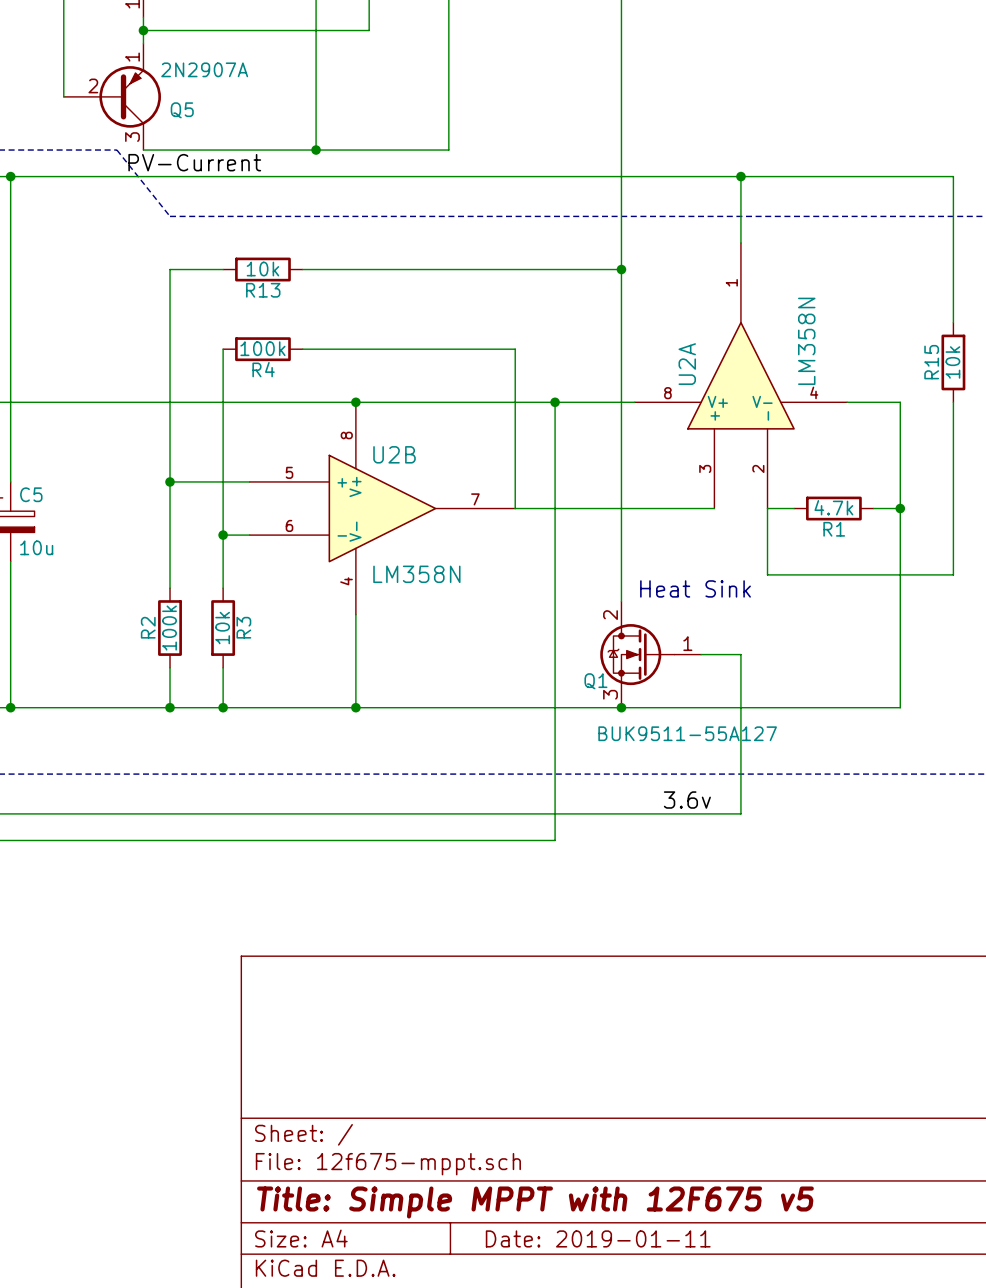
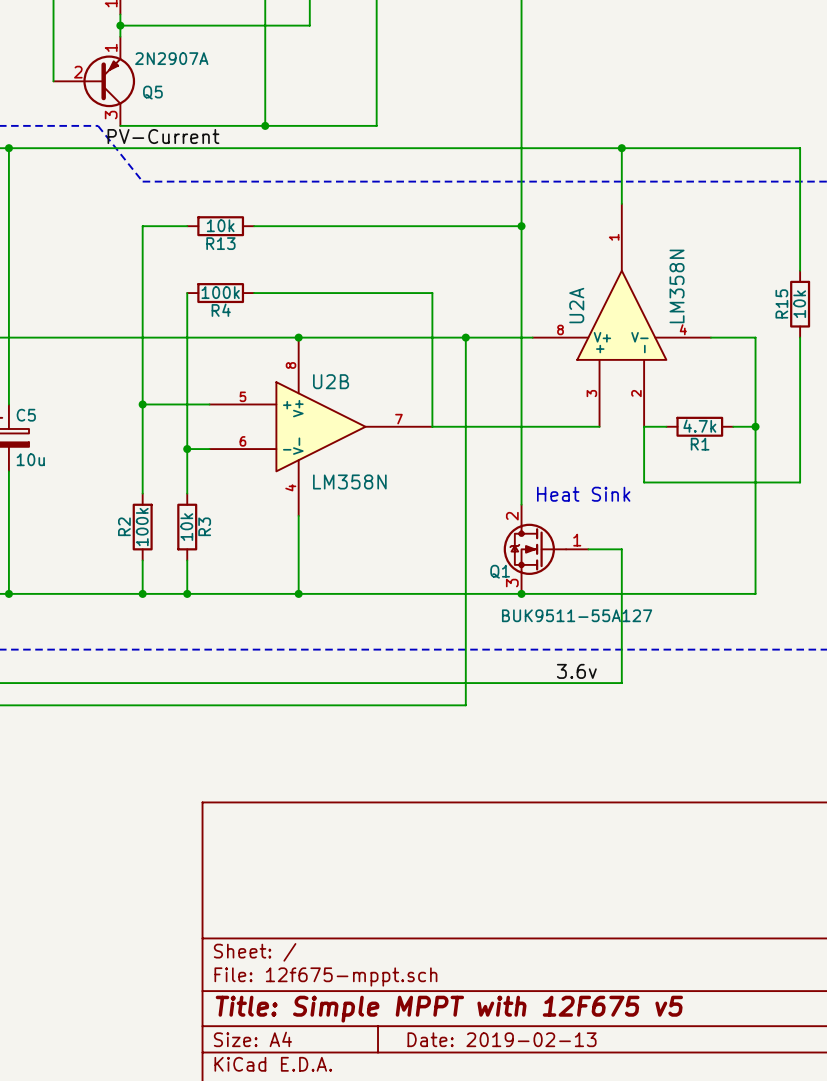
title block: Date: 2019-01-11 (598, 1238) -> Date: 2019-02-13 (502, 1039)

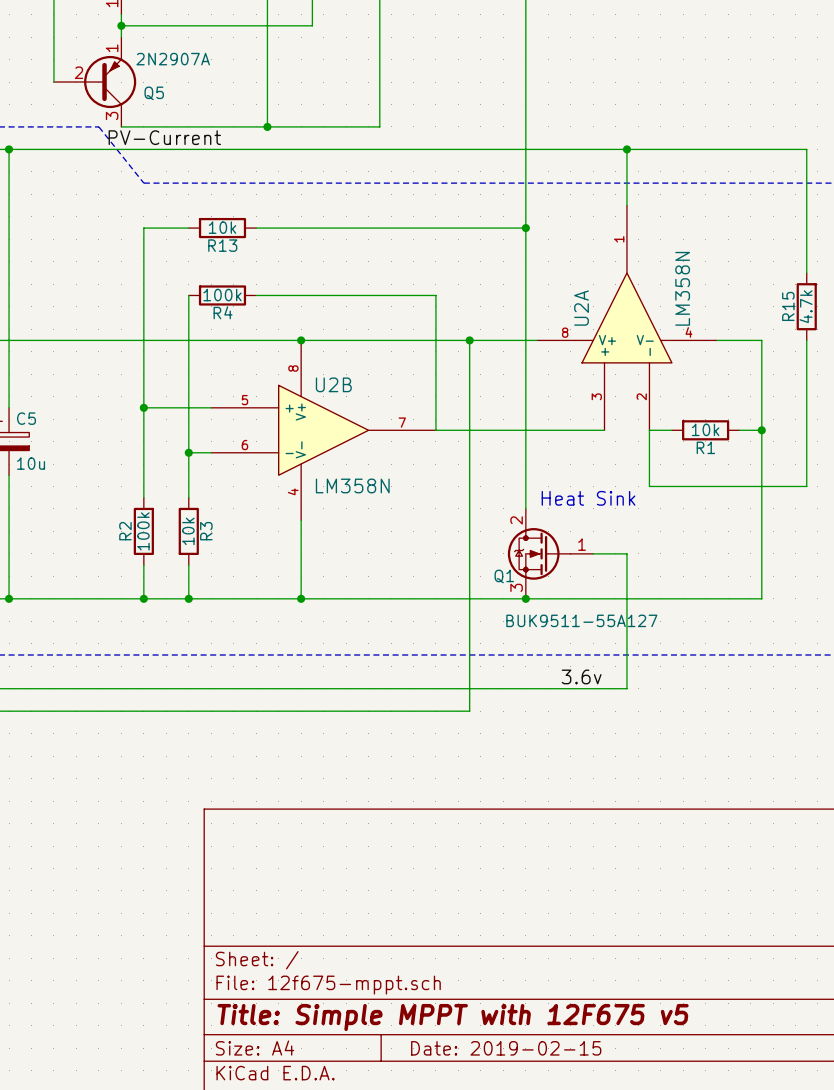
R15 value: 10k (799, 304) -> 4.7k (806, 306)
R1 value: 4.7k (699, 426) -> 10k (705, 429)
title block: Date: 2019-02-13 (502, 1039) -> Date: 2019-02-15 (506, 1048)

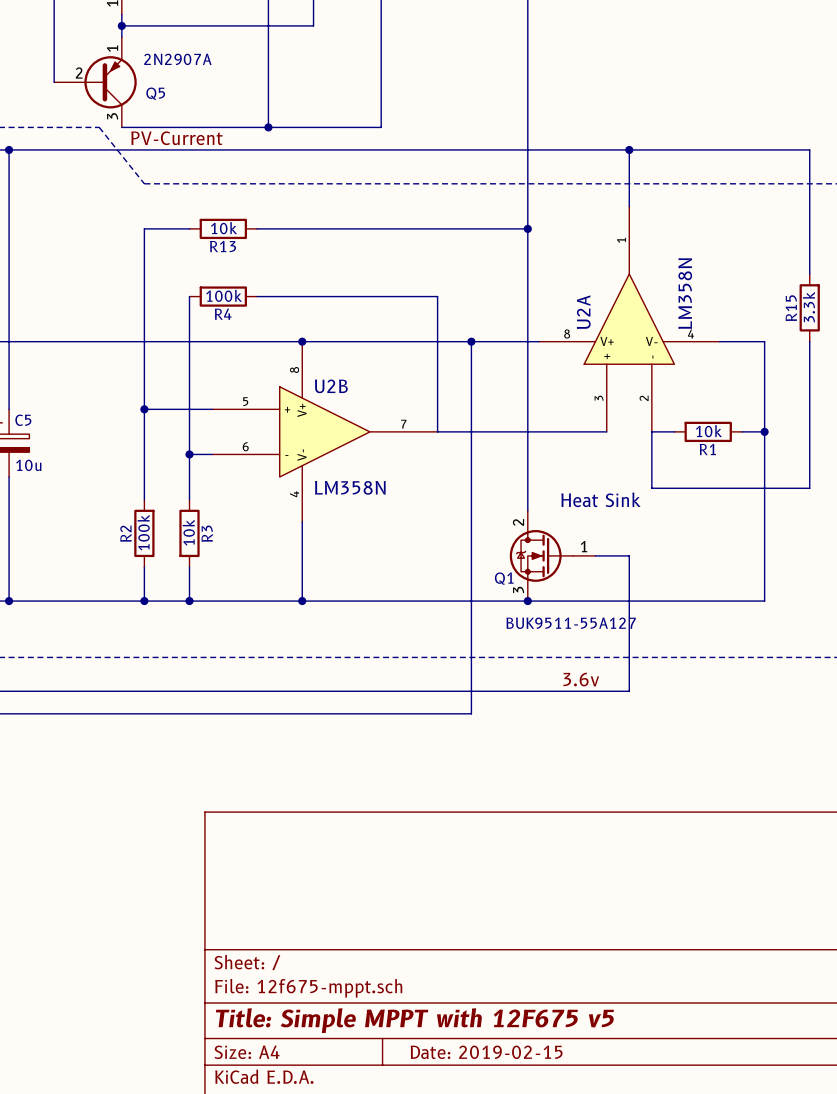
R15 value: 4.7k (806, 306) -> 3.3k (809, 307)

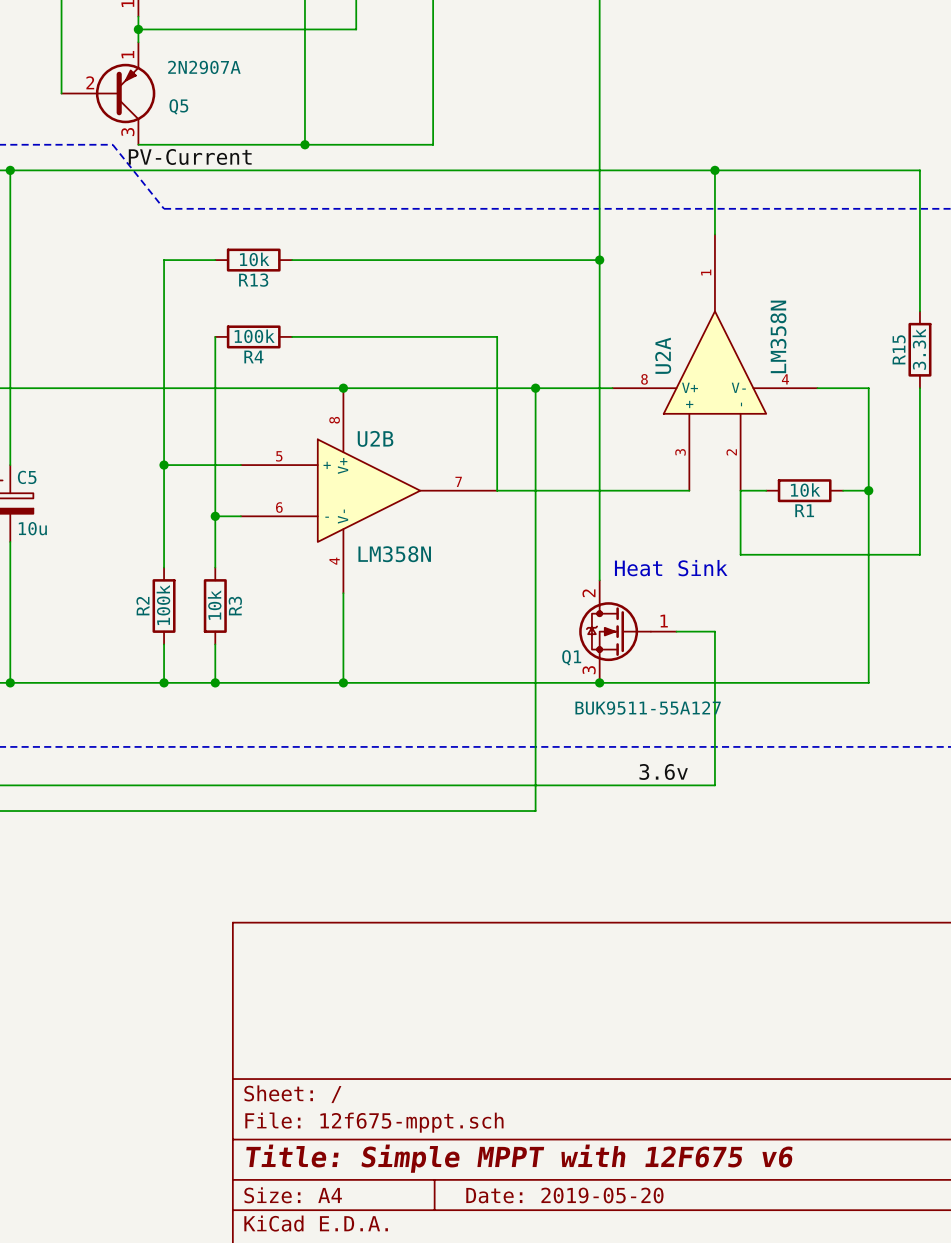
title block: Title: Simple MPPT with 12F675 v5 (414, 1020) -> Title: Simple MPPT with 12F675 v6 (519, 1158)
title block: Date: 2019-02-15 (486, 1052) -> Date: 2019-05-20 (564, 1195)

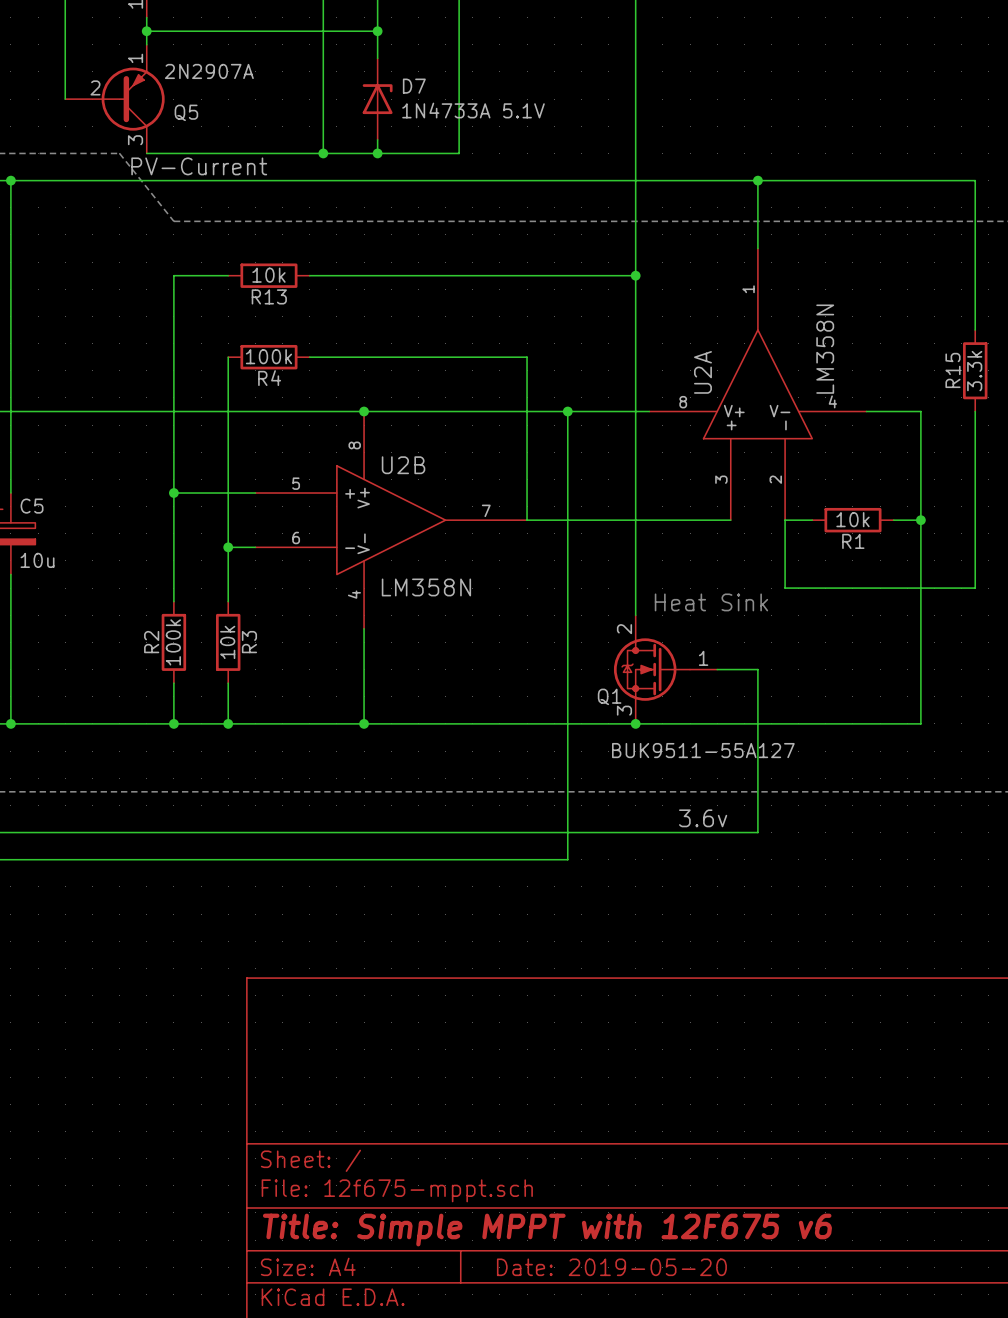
wire: none -> (377, 31) (377, 58)
junction: none -> (377, 31)
D7: none -> 1N4733A 5.1V (377, 99)
wire: none -> (377, 139) (377, 153)
junction: none -> (377, 153)

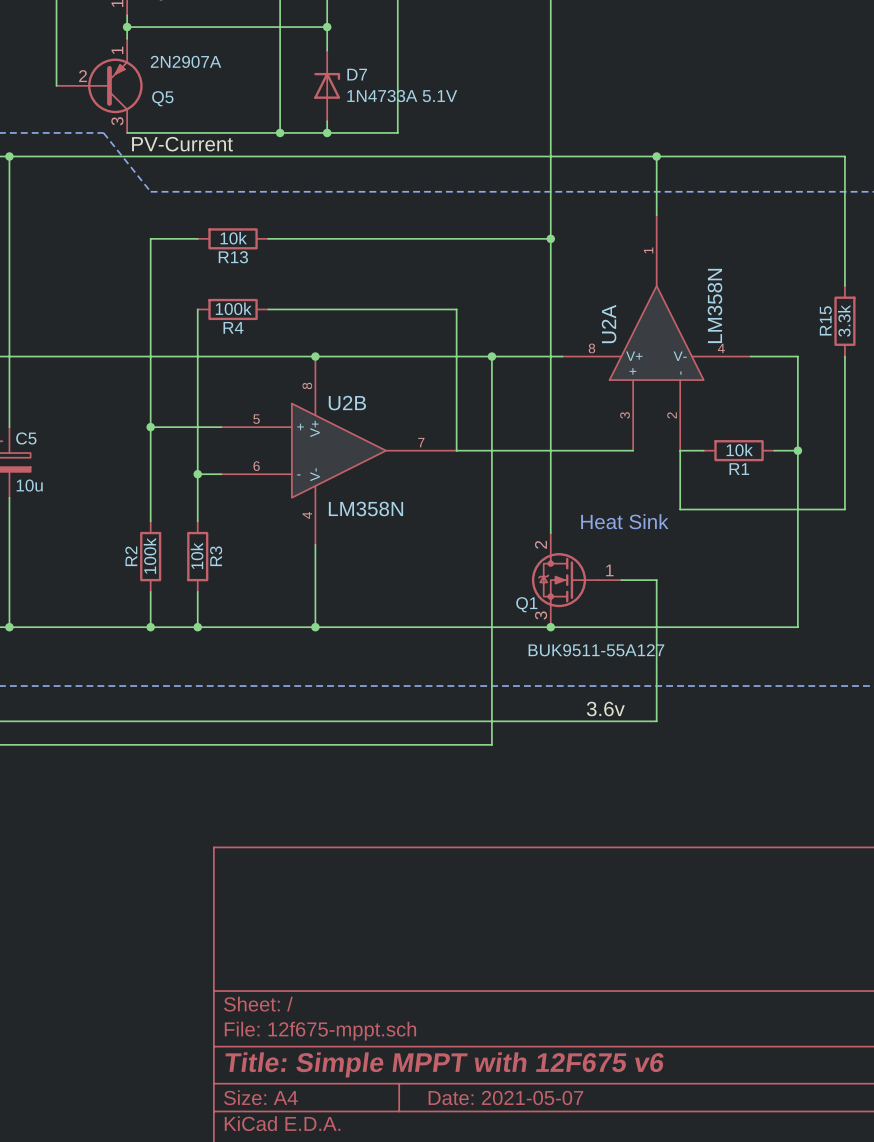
title block: Date: 2019-05-20 (611, 1267) -> Date: 2021-05-07 (505, 1097)

